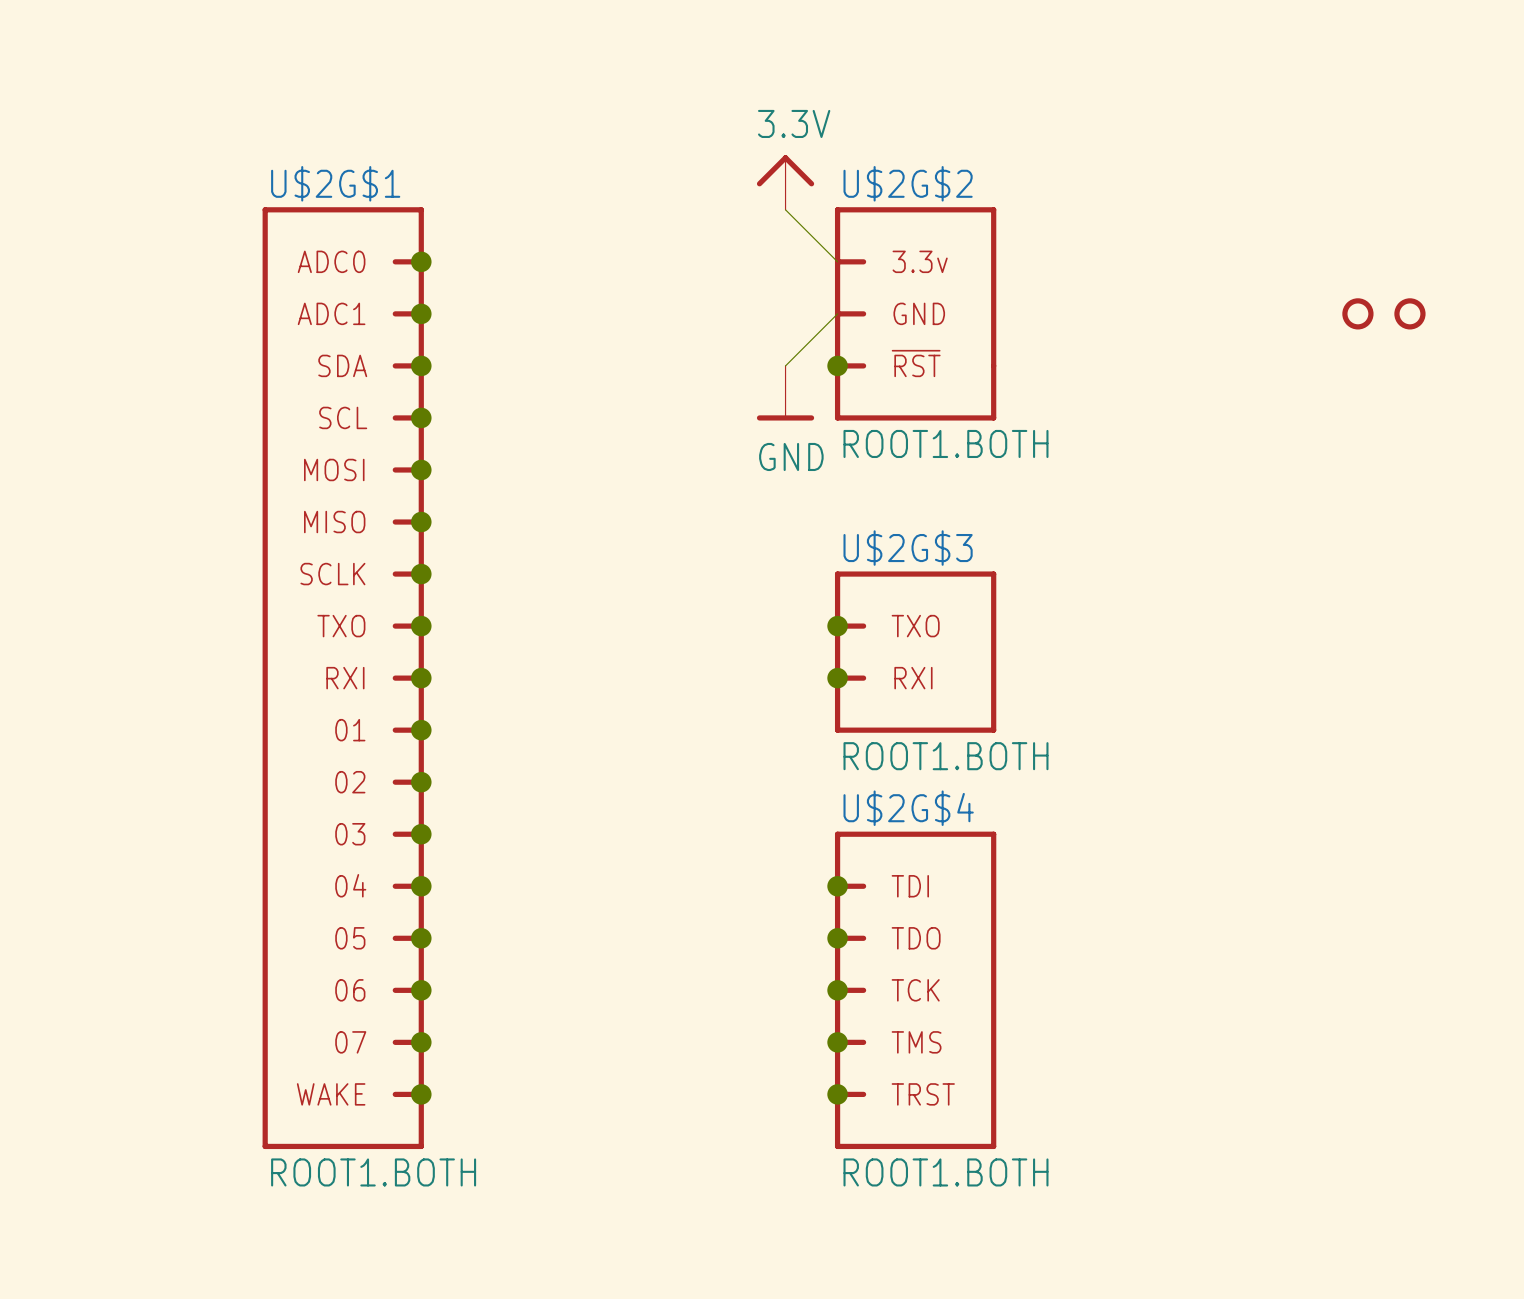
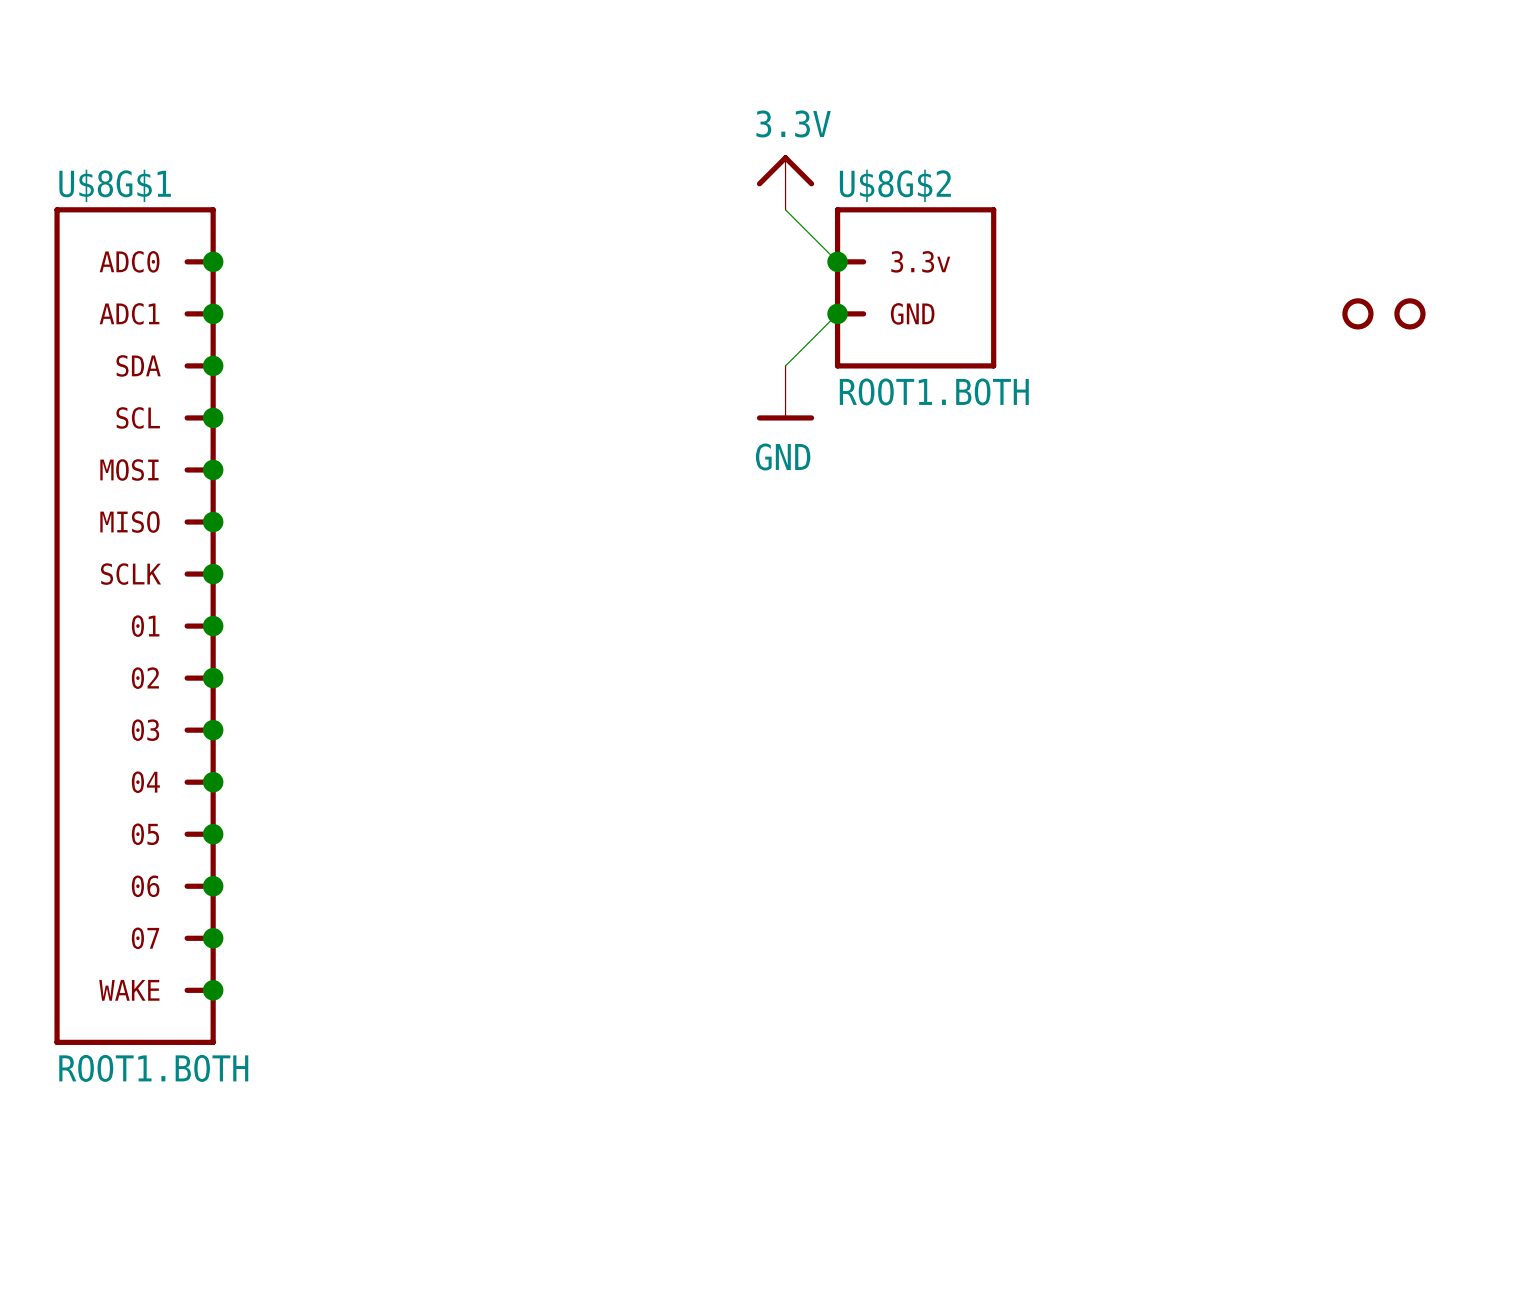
junction: none -> (213, 261)
junction: (421, 261) -> none
junction: none -> (837, 261)
U$8G$2: none -> ROOT1.BOTH (915, 287)
junction: none -> (213, 313)
junction: (421, 313) -> none
junction: none -> (837, 313)
U$2G$2: ROOT1.BOTH (915, 313) -> none
junction: none -> (213, 365)
junction: (421, 365) -> none
junction: (837, 365) -> none
junction: none -> (213, 417)
junction: (421, 417) -> none
junction: none -> (213, 469)
junction: (421, 469) -> none
junction: none -> (213, 522)
junction: (421, 522) -> none
junction: none -> (213, 574)
junction: (421, 574) -> none
U$8G$1: none -> ROOT1.BOTH (135, 626)
junction: none -> (213, 626)
junction: (421, 626) -> none
junction: (837, 626) -> none
U$2G$3: ROOT1.BOTH (915, 652) -> none
junction: none -> (213, 678)
U$2G$1: ROOT1.BOTH (343, 678) -> none
junction: (421, 678) -> none
junction: (837, 678) -> none
junction: none -> (213, 730)
junction: (421, 730) -> none
junction: none -> (213, 782)
junction: (421, 782) -> none
junction: none -> (213, 834)
junction: (421, 834) -> none
junction: none -> (213, 886)
junction: (421, 886) -> none
junction: (837, 886) -> none
junction: none -> (213, 938)
junction: (421, 938) -> none
junction: (837, 938) -> none
junction: none -> (213, 990)
junction: (421, 990) -> none
junction: (837, 990) -> none
U$2G$4: ROOT1.BOTH (915, 990) -> none
junction: (421, 1042) -> none
junction: (837, 1042) -> none
junction: (421, 1094) -> none
junction: (837, 1094) -> none

